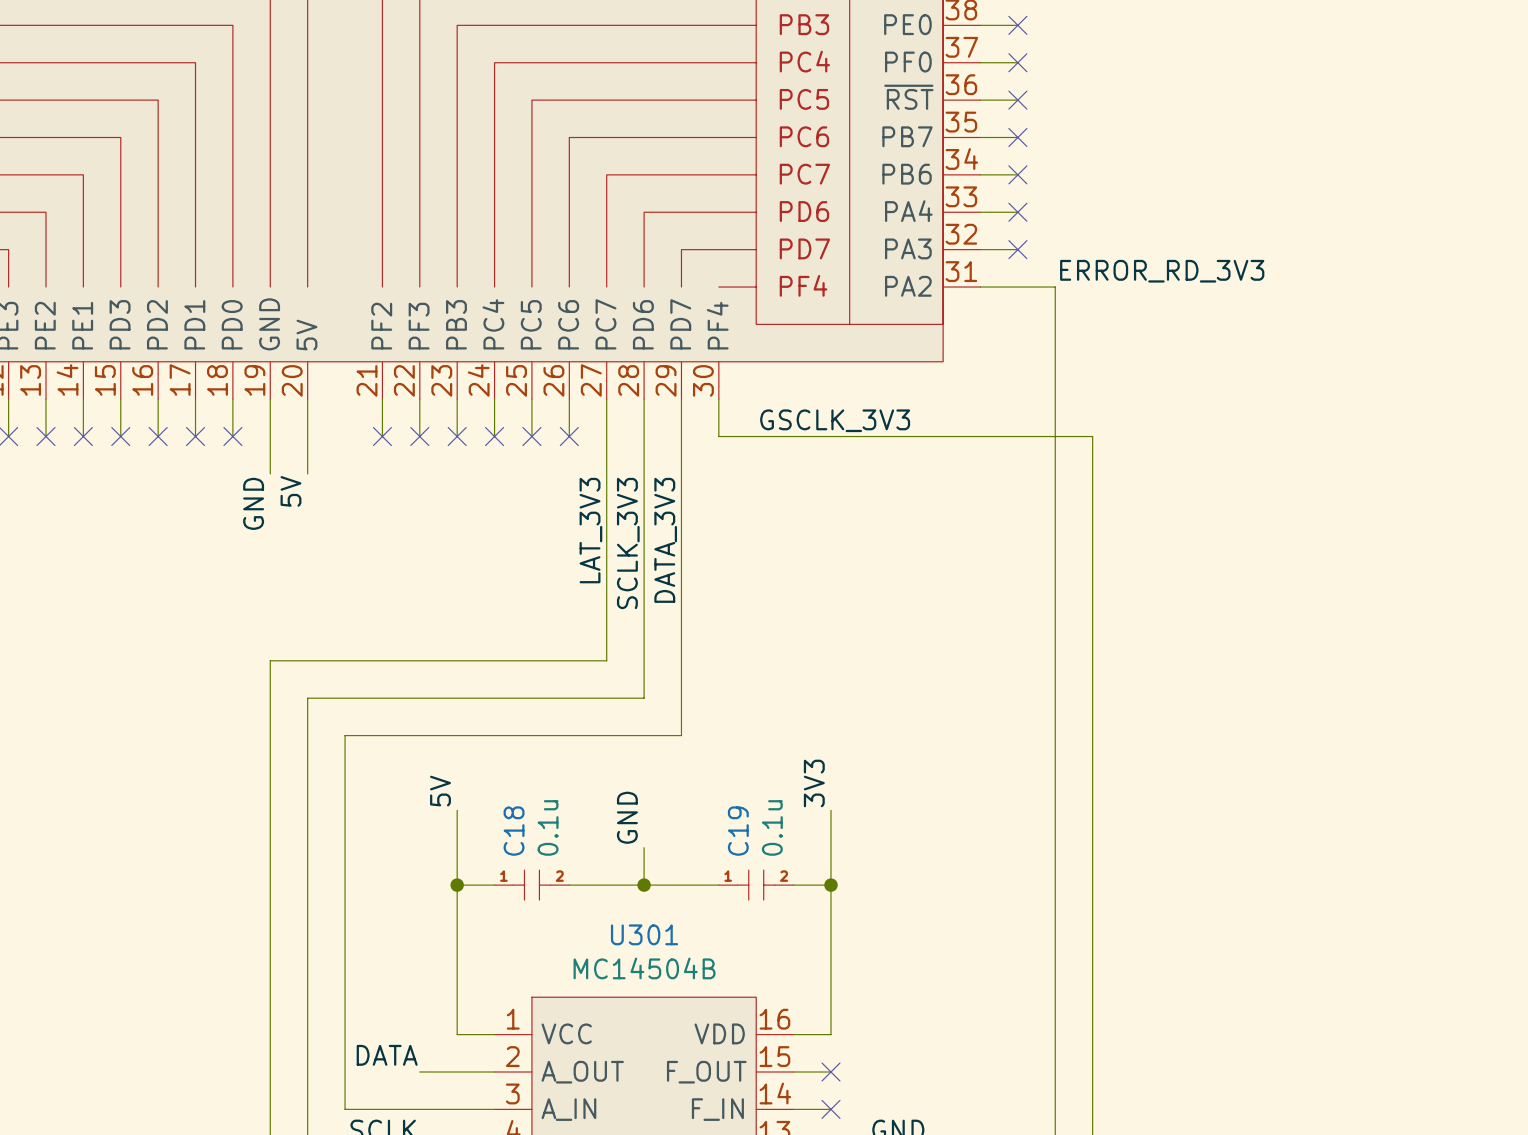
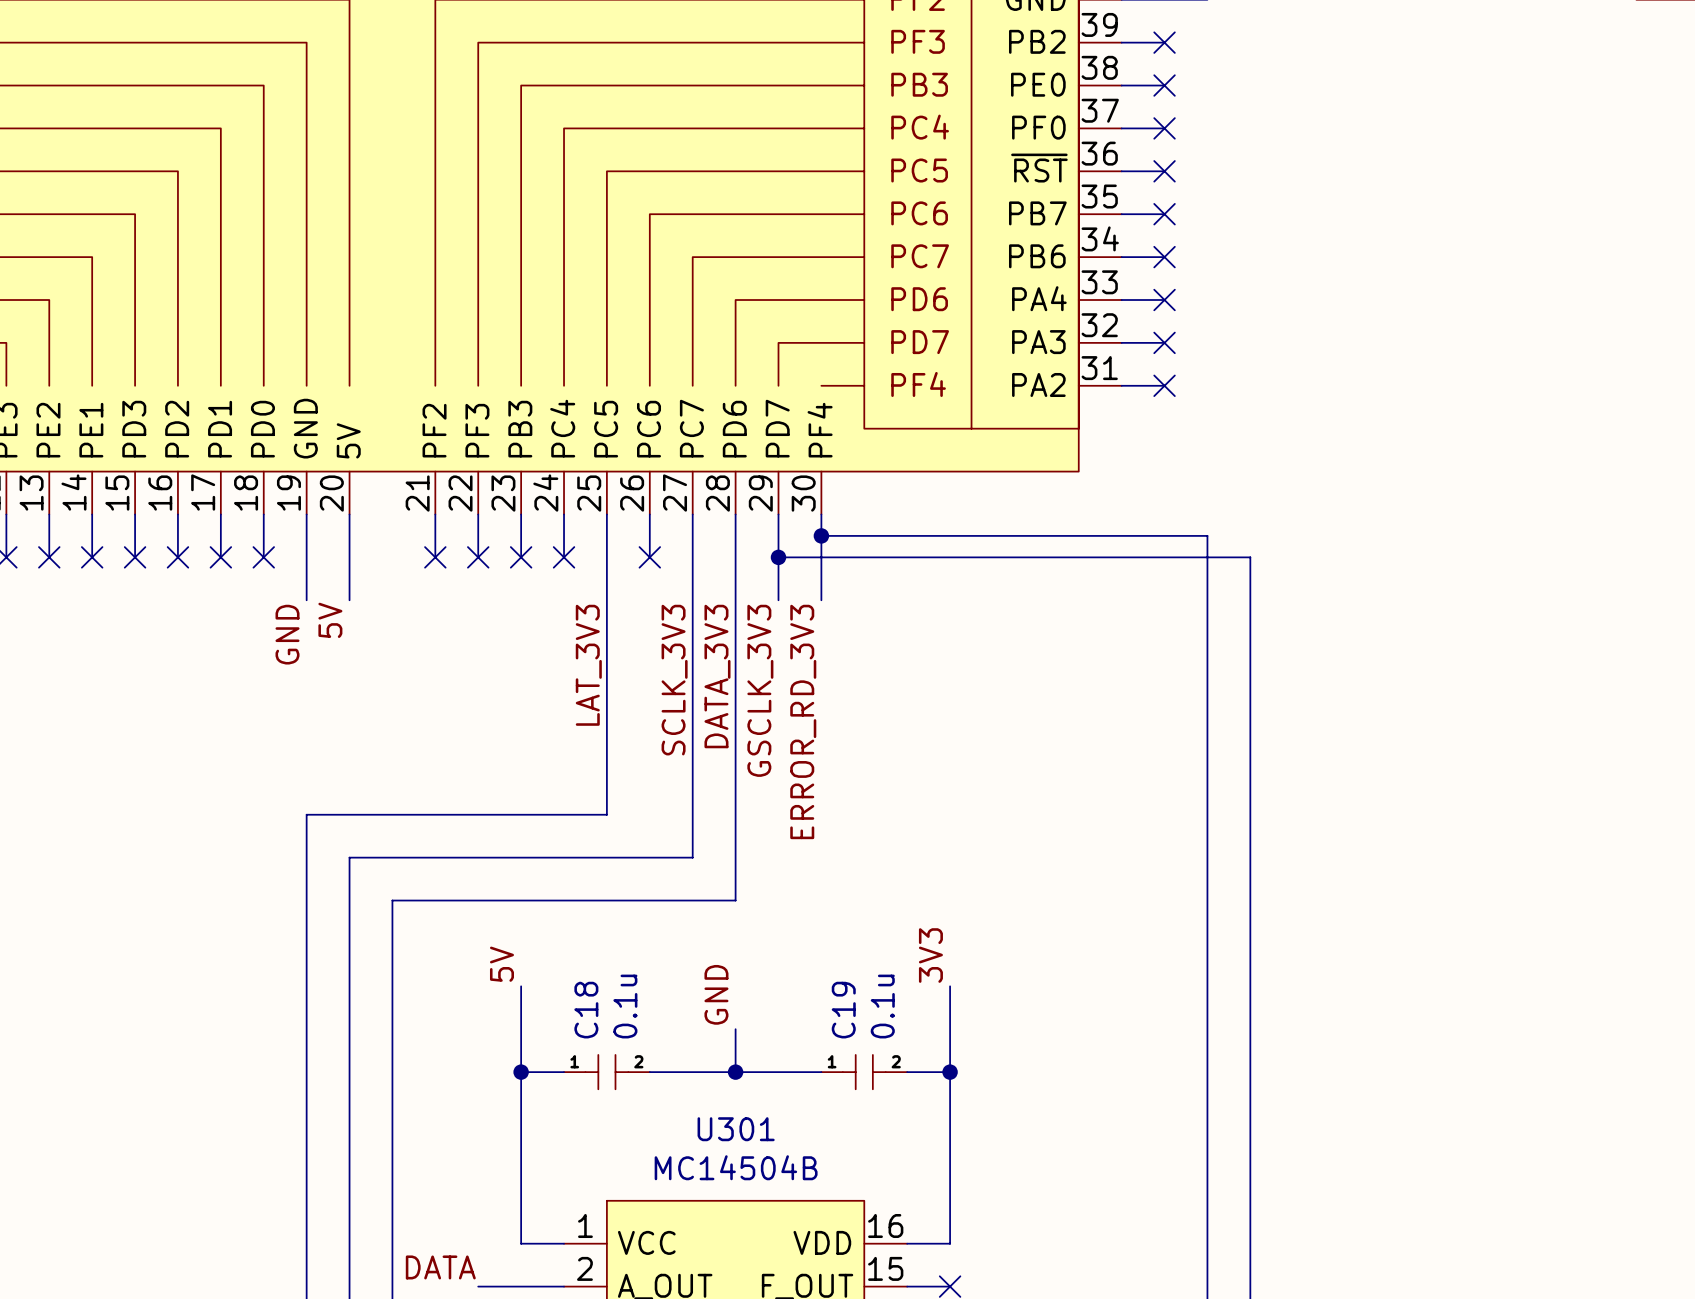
label: ERROR_RD_3V3 (1162, 271) -> none
wire: (1017, 287) (1055, 287) (1055, 417) -> (821, 535) (1207, 535)
no-connect mark: none -> (1164, 385)
junction: none -> (821, 535)
label: GSCLK_3V3 (835, 420) -> none
no-connect mark: (531, 436) -> none
wire: none -> (778, 557) (821, 557) (821, 600)
junction: none -> (778, 557)
wire: (681, 473) (681, 735) (644, 735) -> (735, 857) (735, 900)
label: none -> LAT_3V3 (588, 665)
label: LAT_3V3 (590, 530) -> SCLK_3V3 (674, 680)
label: DATA_3V3 (665, 540) -> GSCLK_3V3 (760, 690)
label: SCLK_3V3 (628, 543) -> DATA_3V3 (717, 676)
label: none -> ERROR_RD_3V3 (803, 721)
wire: (531, 660) (606, 660) -> (606, 814) (606, 557)
wire: (606, 698) (644, 698) -> (692, 857) (692, 814)

